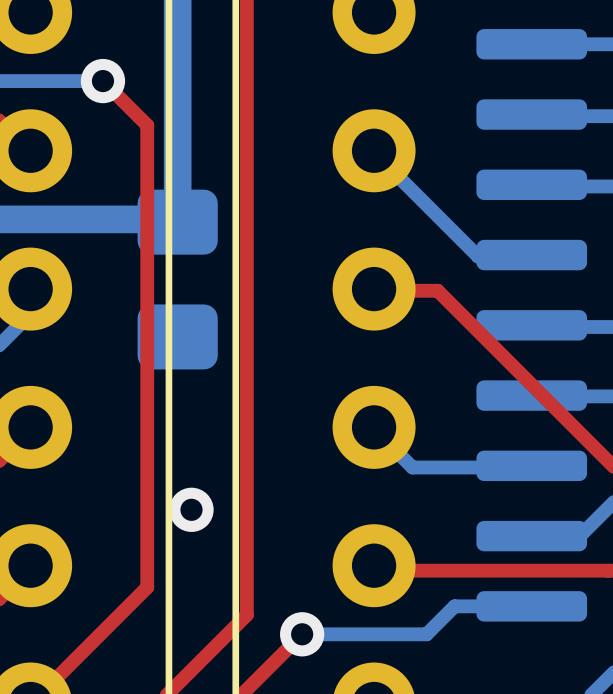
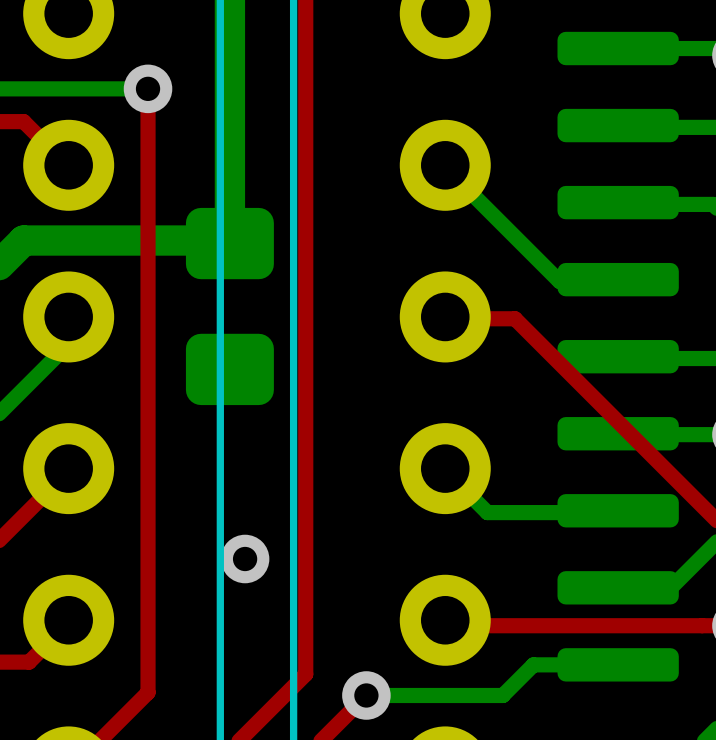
top track: (102, 81) (147, 125) (147, 587) (102, 631) -> (148, 88) (148, 692)

